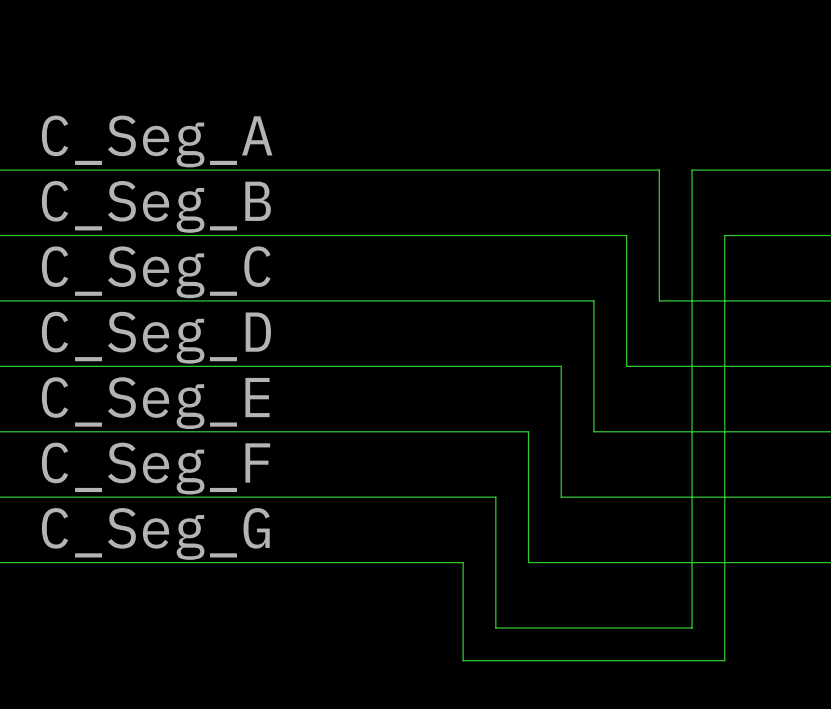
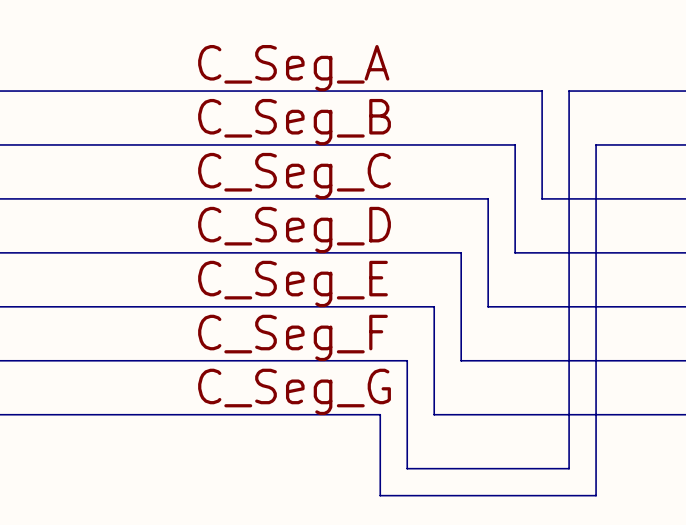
label position: C_Seg_A (157, 141) -> C_Seg_A (293, 68)
label position: C_Seg_B (156, 206) -> C_Seg_B (294, 122)
label position: C_Seg_C (156, 272) -> C_Seg_C (294, 176)
label position: C_Seg_D (156, 337) -> C_Seg_D (294, 230)
label position: C_Seg_E (155, 403) -> C_Seg_E (292, 283)
label position: C_Seg_F (156, 468) -> C_Seg_F (292, 337)
label position: C_Seg_G (155, 533) -> C_Seg_G (294, 391)

